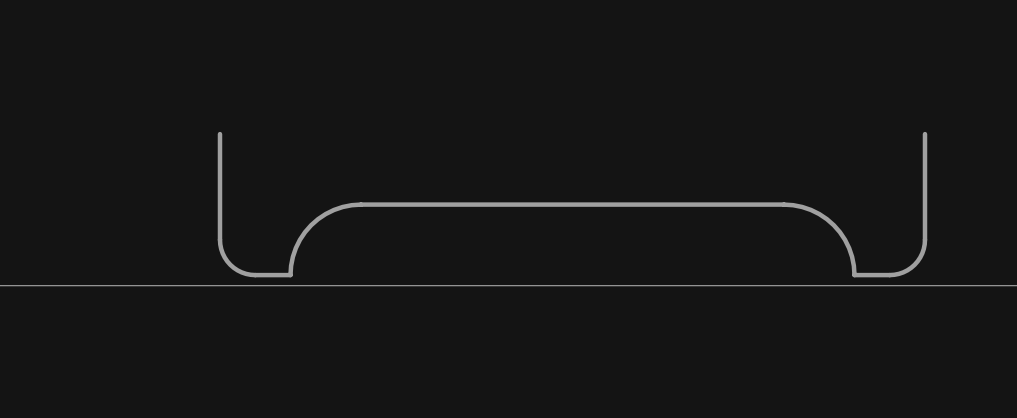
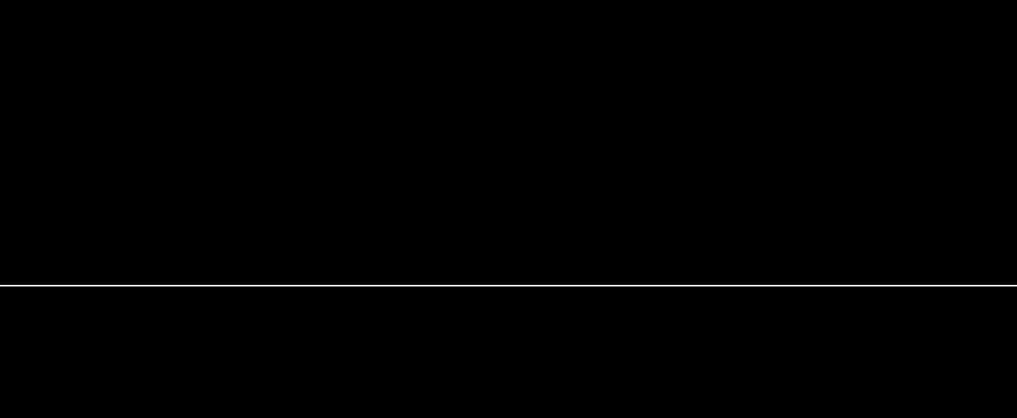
part: (572, 204) -> none

